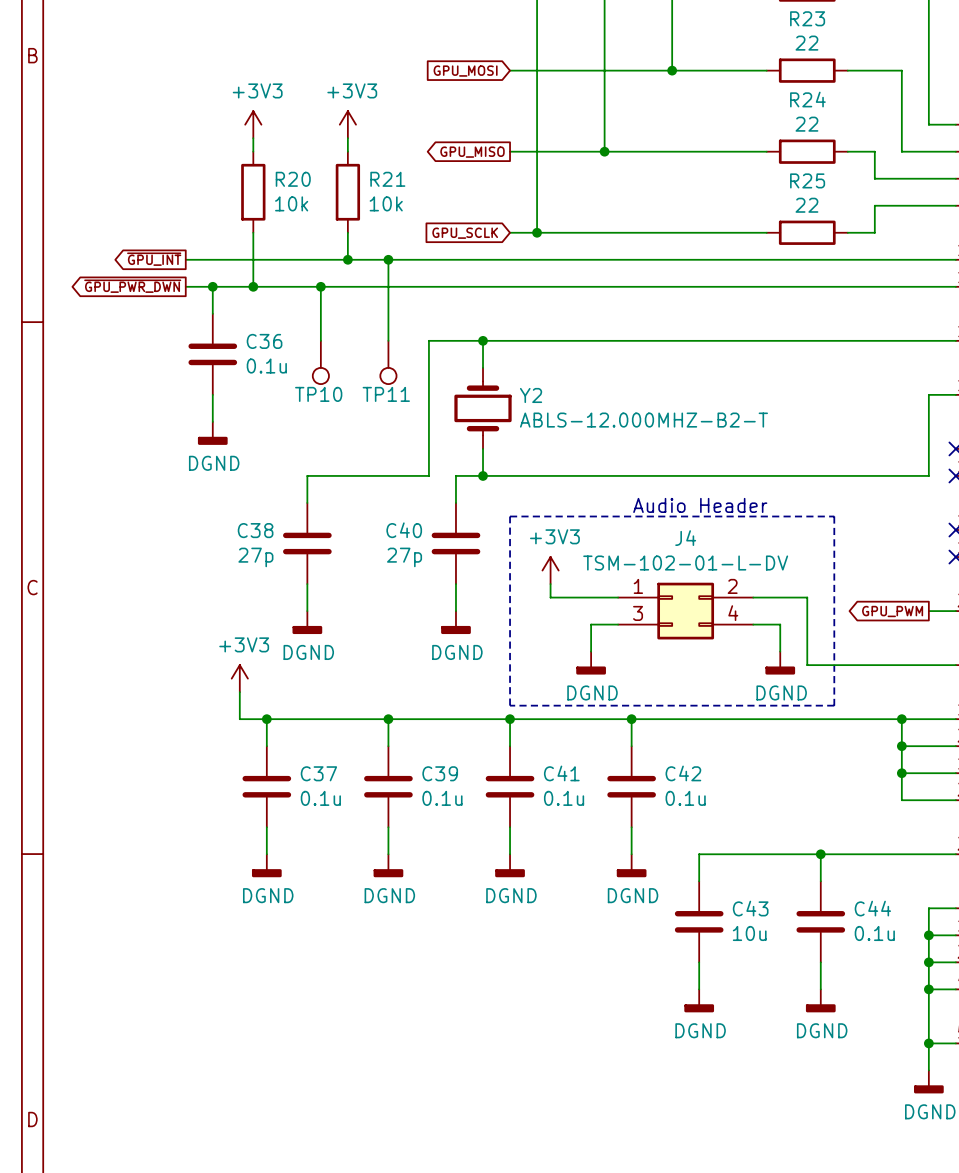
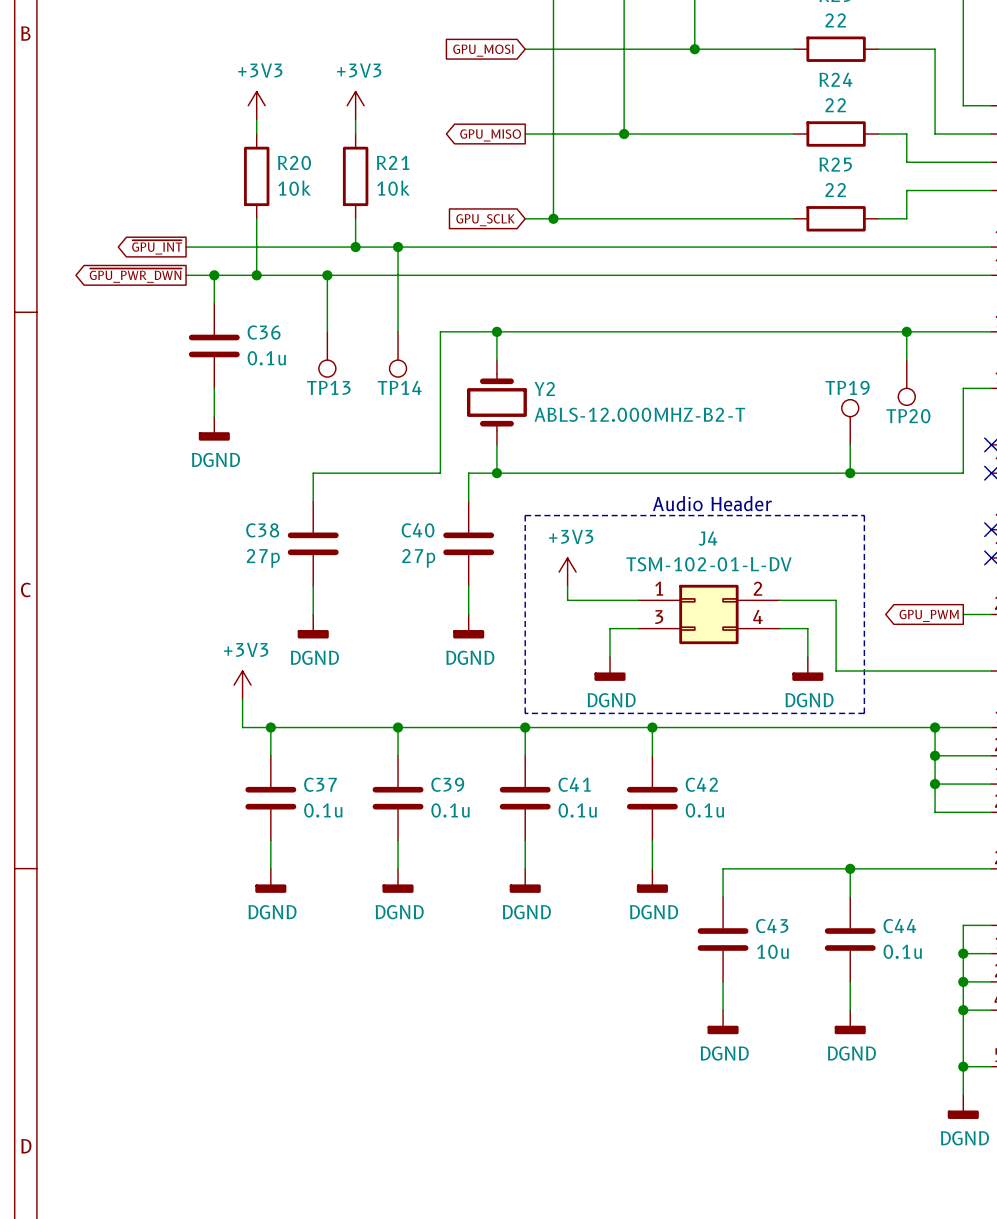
wire: none -> (906, 331) (906, 360)
junction: none -> (906, 331)
TP20: none -> (906, 382)
TP10 name: TP10 (318, 394) -> TP13 (328, 387)
TP11 name: TP11 (386, 394) -> TP14 (399, 387)
TP19: none -> (850, 422)
wire: none -> (850, 444) (850, 473)
junction: none -> (850, 473)

